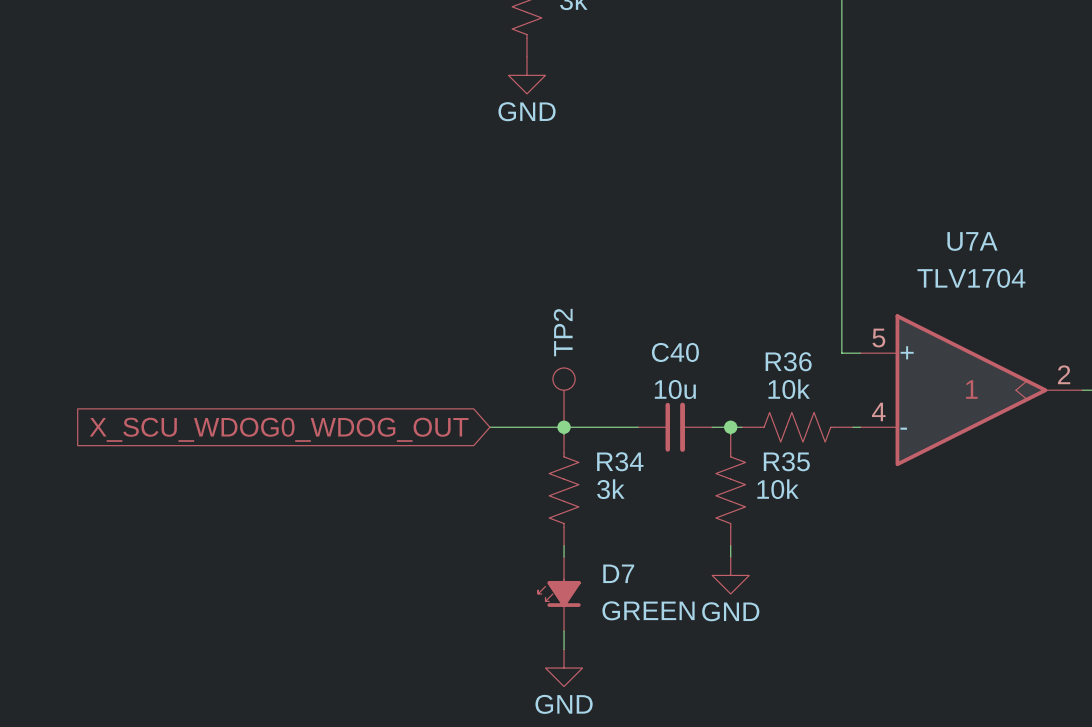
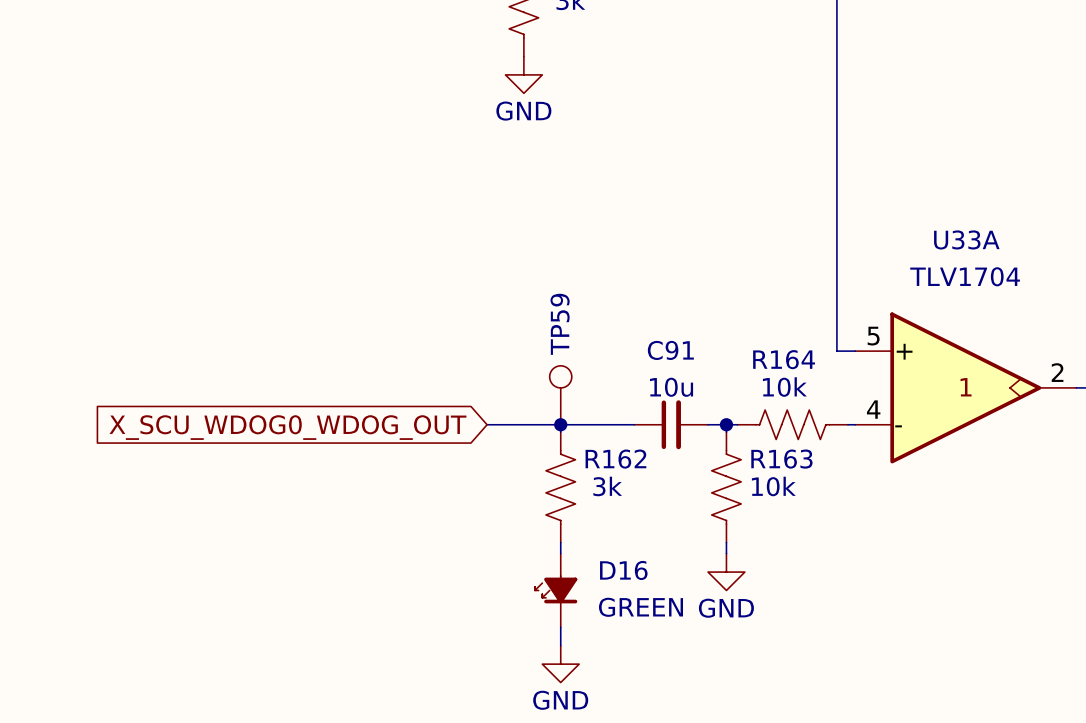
U7A name: U7A (972, 241) -> U33A (966, 239)
TP2 name: TP2 (563, 332) -> TP59 (560, 324)
C40 name: C40 (675, 352) -> C91 (670, 350)
R36 name: R36 (788, 361) -> R164 (784, 359)
R34 name: R34 (620, 461) -> R162 (615, 459)
R35 name: R35 (786, 461) -> R163 (781, 459)
D7 name: D7 (618, 573) -> D16 (623, 570)

